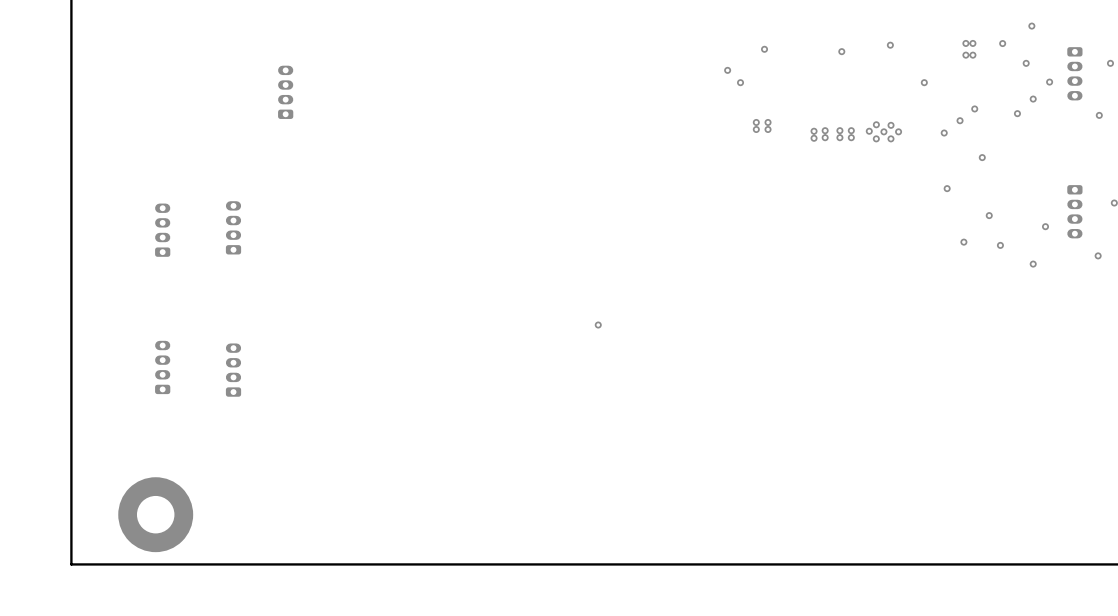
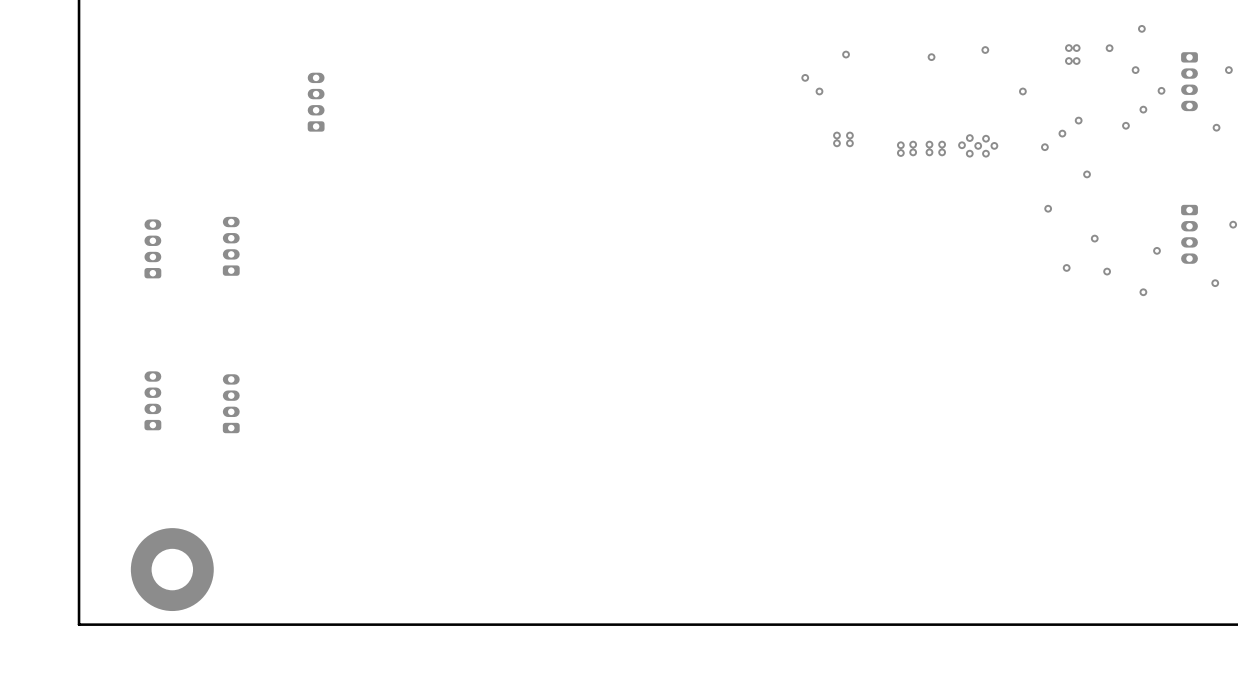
part: none -> (231, 246)
part: none -> (152, 248)
part: (233, 227) -> none
part: (162, 230) -> none
via: (598, 325) -> none
part: none -> (152, 400)
part: none -> (231, 403)
part: (162, 367) -> none
part: (233, 370) -> none

